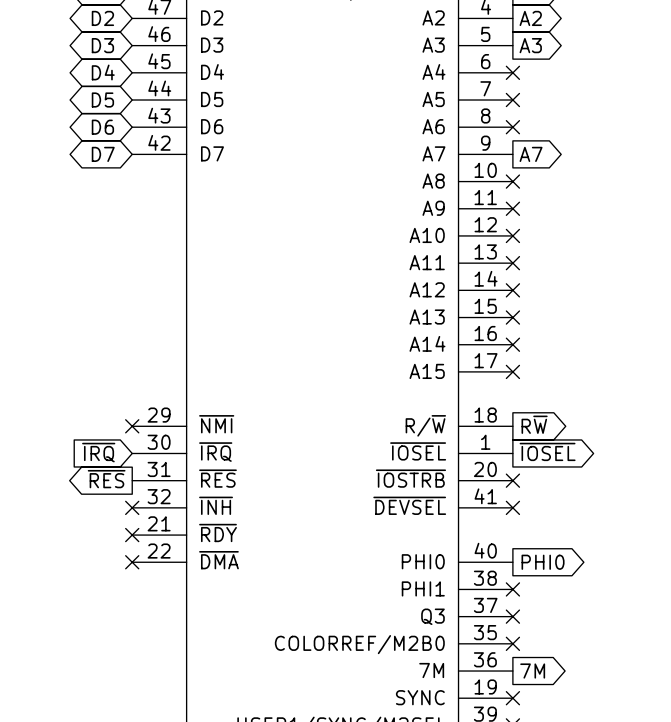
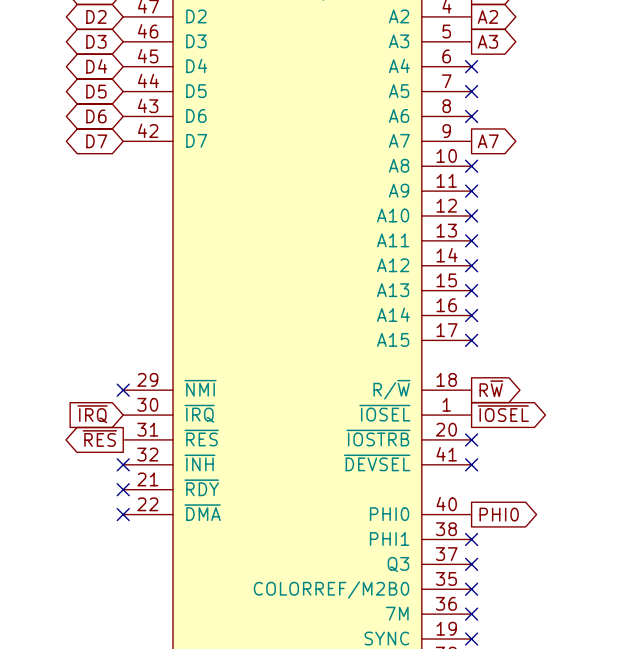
no-connect mark: none -> (471, 614)
global label: 7M (532, 671) -> none

